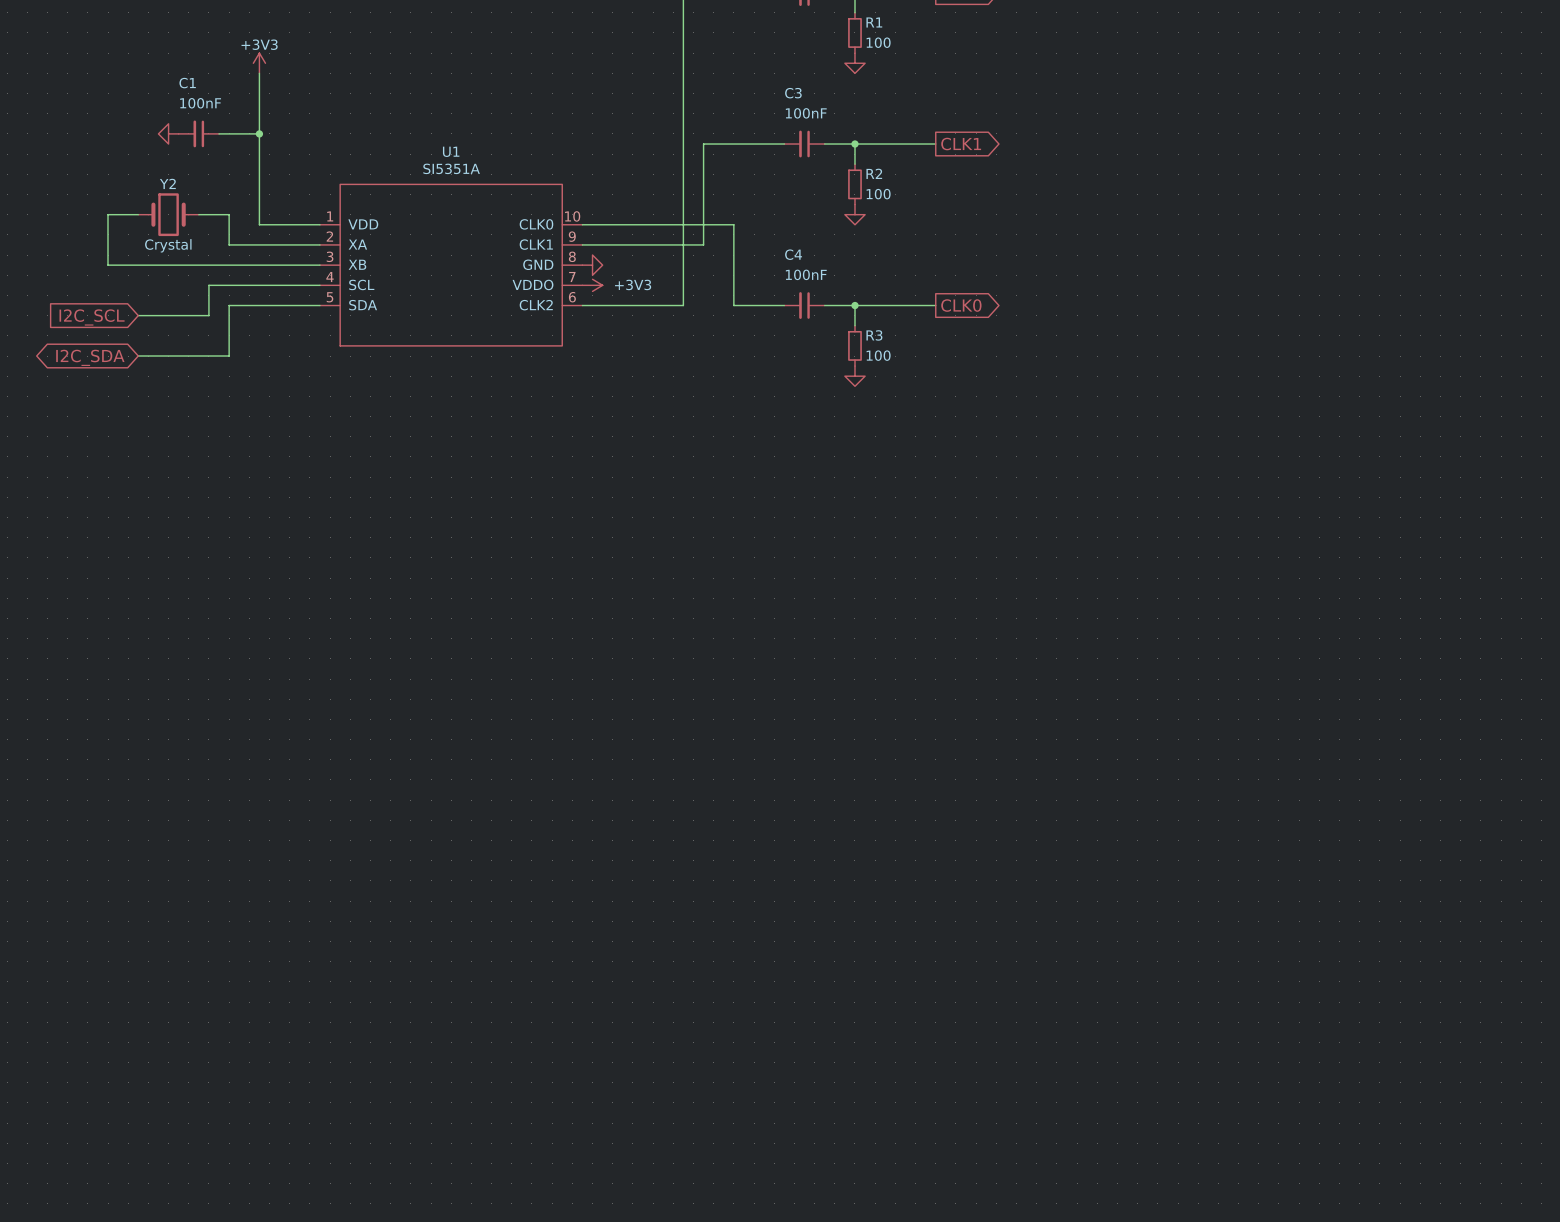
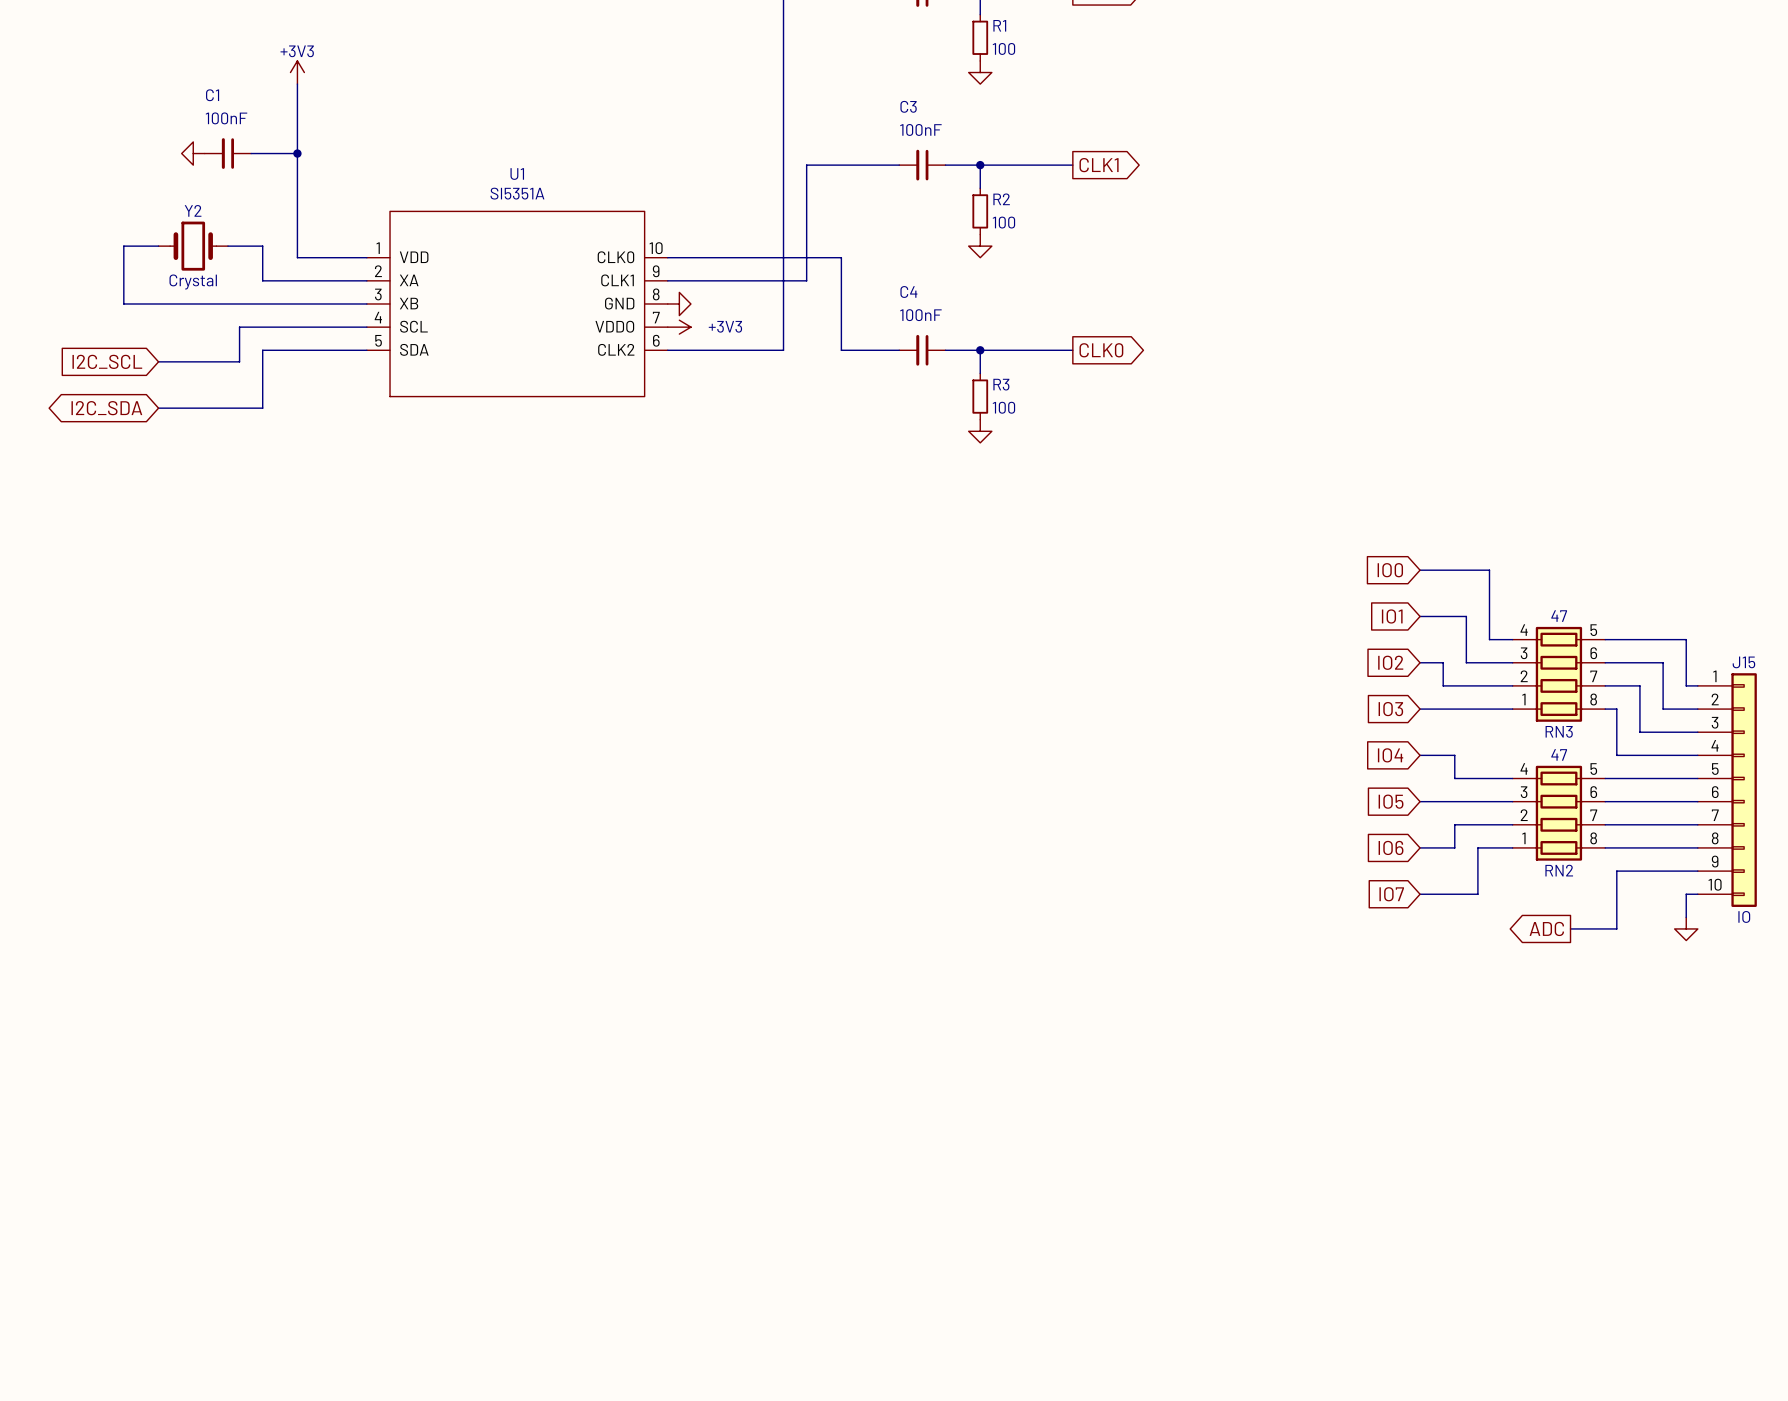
global label: none -> IO0 (1390, 570)
wire: none -> (1420, 570) (1489, 570) (1489, 639) (1512, 639)
global label: none -> IO1 (1392, 616)
wire: none -> (1420, 616) (1466, 616) (1466, 662) (1512, 662)
wire: none -> (1605, 639) (1686, 639) (1686, 685) (1697, 685)
global label: none -> IO2 (1390, 662)
wire: none -> (1420, 662) (1443, 662) (1443, 685) (1512, 685)
wire: none -> (1605, 662) (1663, 662) (1663, 709) (1697, 709)
RN3: none -> 47 (1558, 674)
wire: none -> (1605, 685) (1639, 685) (1639, 732) (1697, 732)
global label: none -> IO3 (1390, 709)
wire: none -> (1420, 709) (1512, 709)
wire: none -> (1605, 709) (1616, 709) (1616, 755) (1697, 755)
global label: none -> IO4 (1390, 755)
wire: none -> (1420, 755) (1454, 755) (1454, 778) (1512, 778)
wire: none -> (1605, 778) (1697, 778)
J15: none -> IO (1727, 790)
global label: none -> IO5 (1391, 801)
wire: none -> (1420, 801) (1512, 801)
wire: none -> (1605, 801) (1697, 801)
RN2: none -> 47 (1558, 813)
wire: none -> (1512, 824) (1454, 824) (1454, 847) (1420, 847)
wire: none -> (1605, 824) (1697, 824)
global label: none -> IO6 (1391, 847)
wire: none -> (1512, 847) (1477, 847) (1477, 894) (1420, 894)
wire: none -> (1605, 847) (1697, 847)
wire: none -> (1697, 871) (1616, 871) (1616, 928) (1570, 928)
global label: none -> IO7 (1391, 894)
wire: none -> (1697, 894) (1686, 894) (1686, 917)
global label: none -> ADC (1546, 928)
power symbol: none -> (1686, 928)

